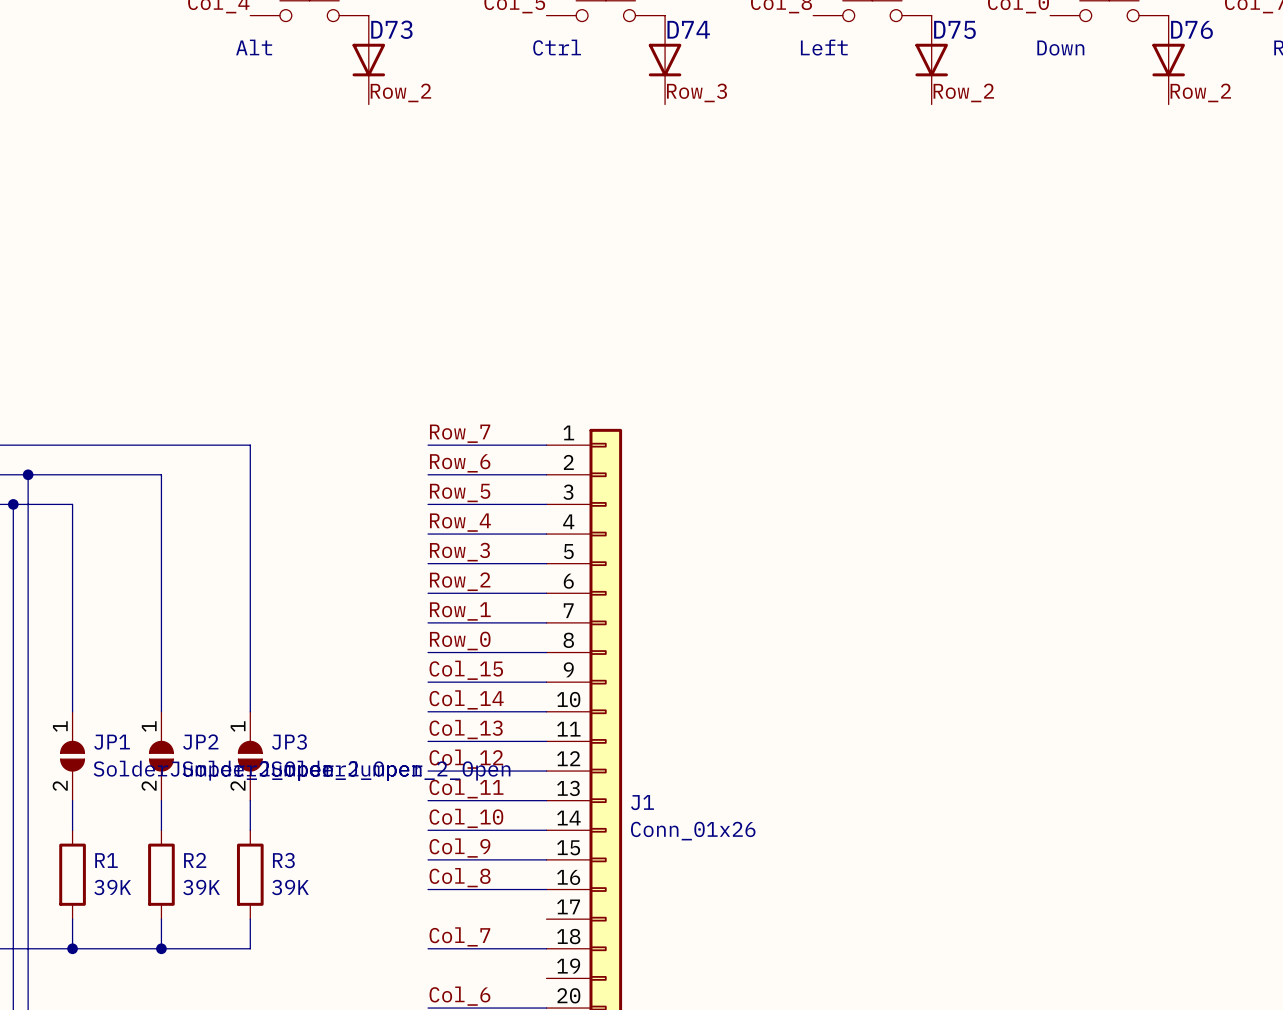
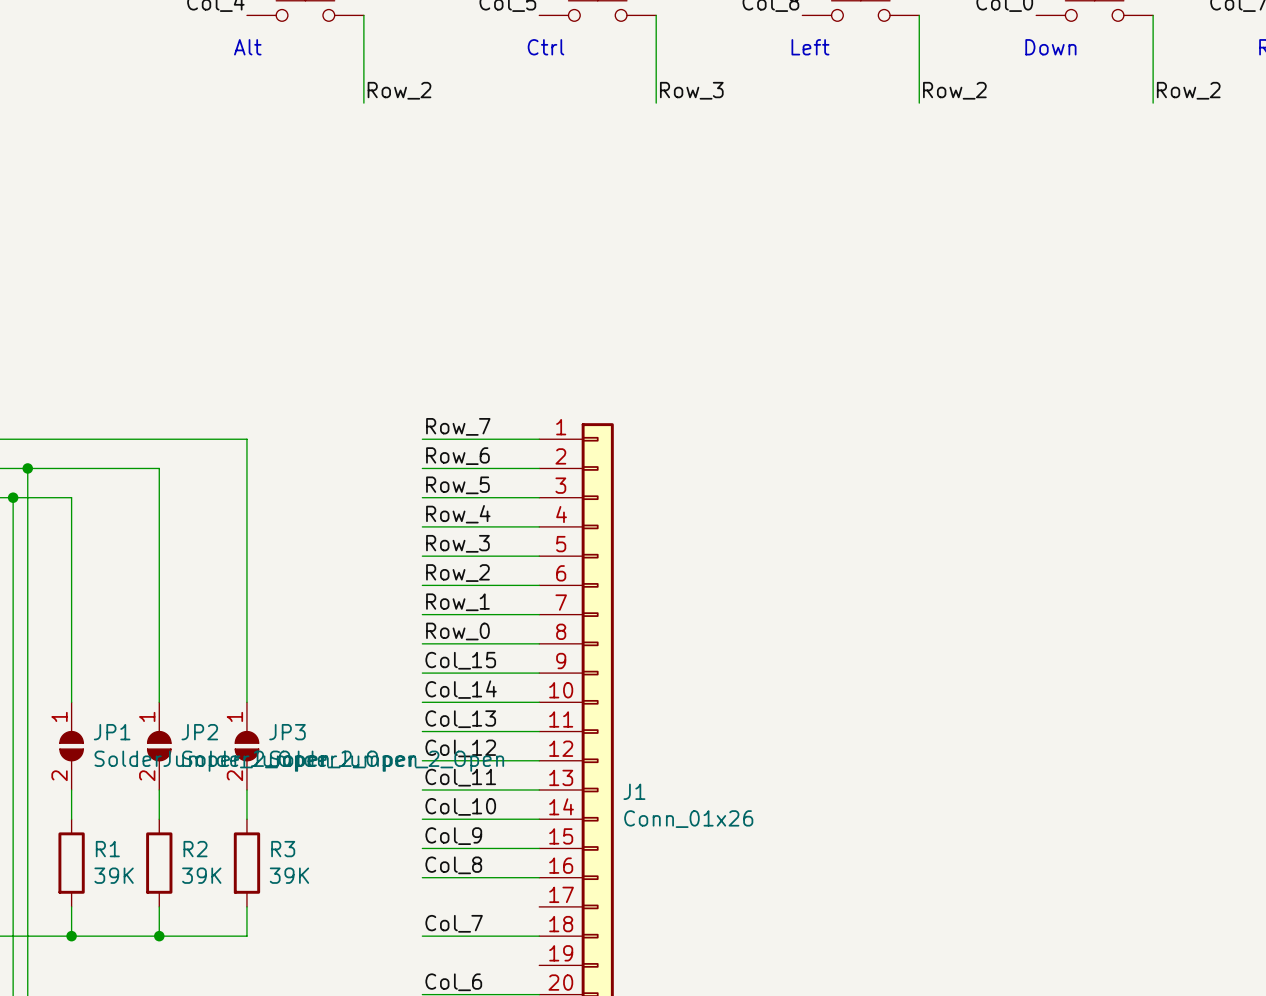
D73: (368, 60) -> none
D74: (665, 60) -> none
D75: (931, 60) -> none
D76: (1168, 60) -> none

